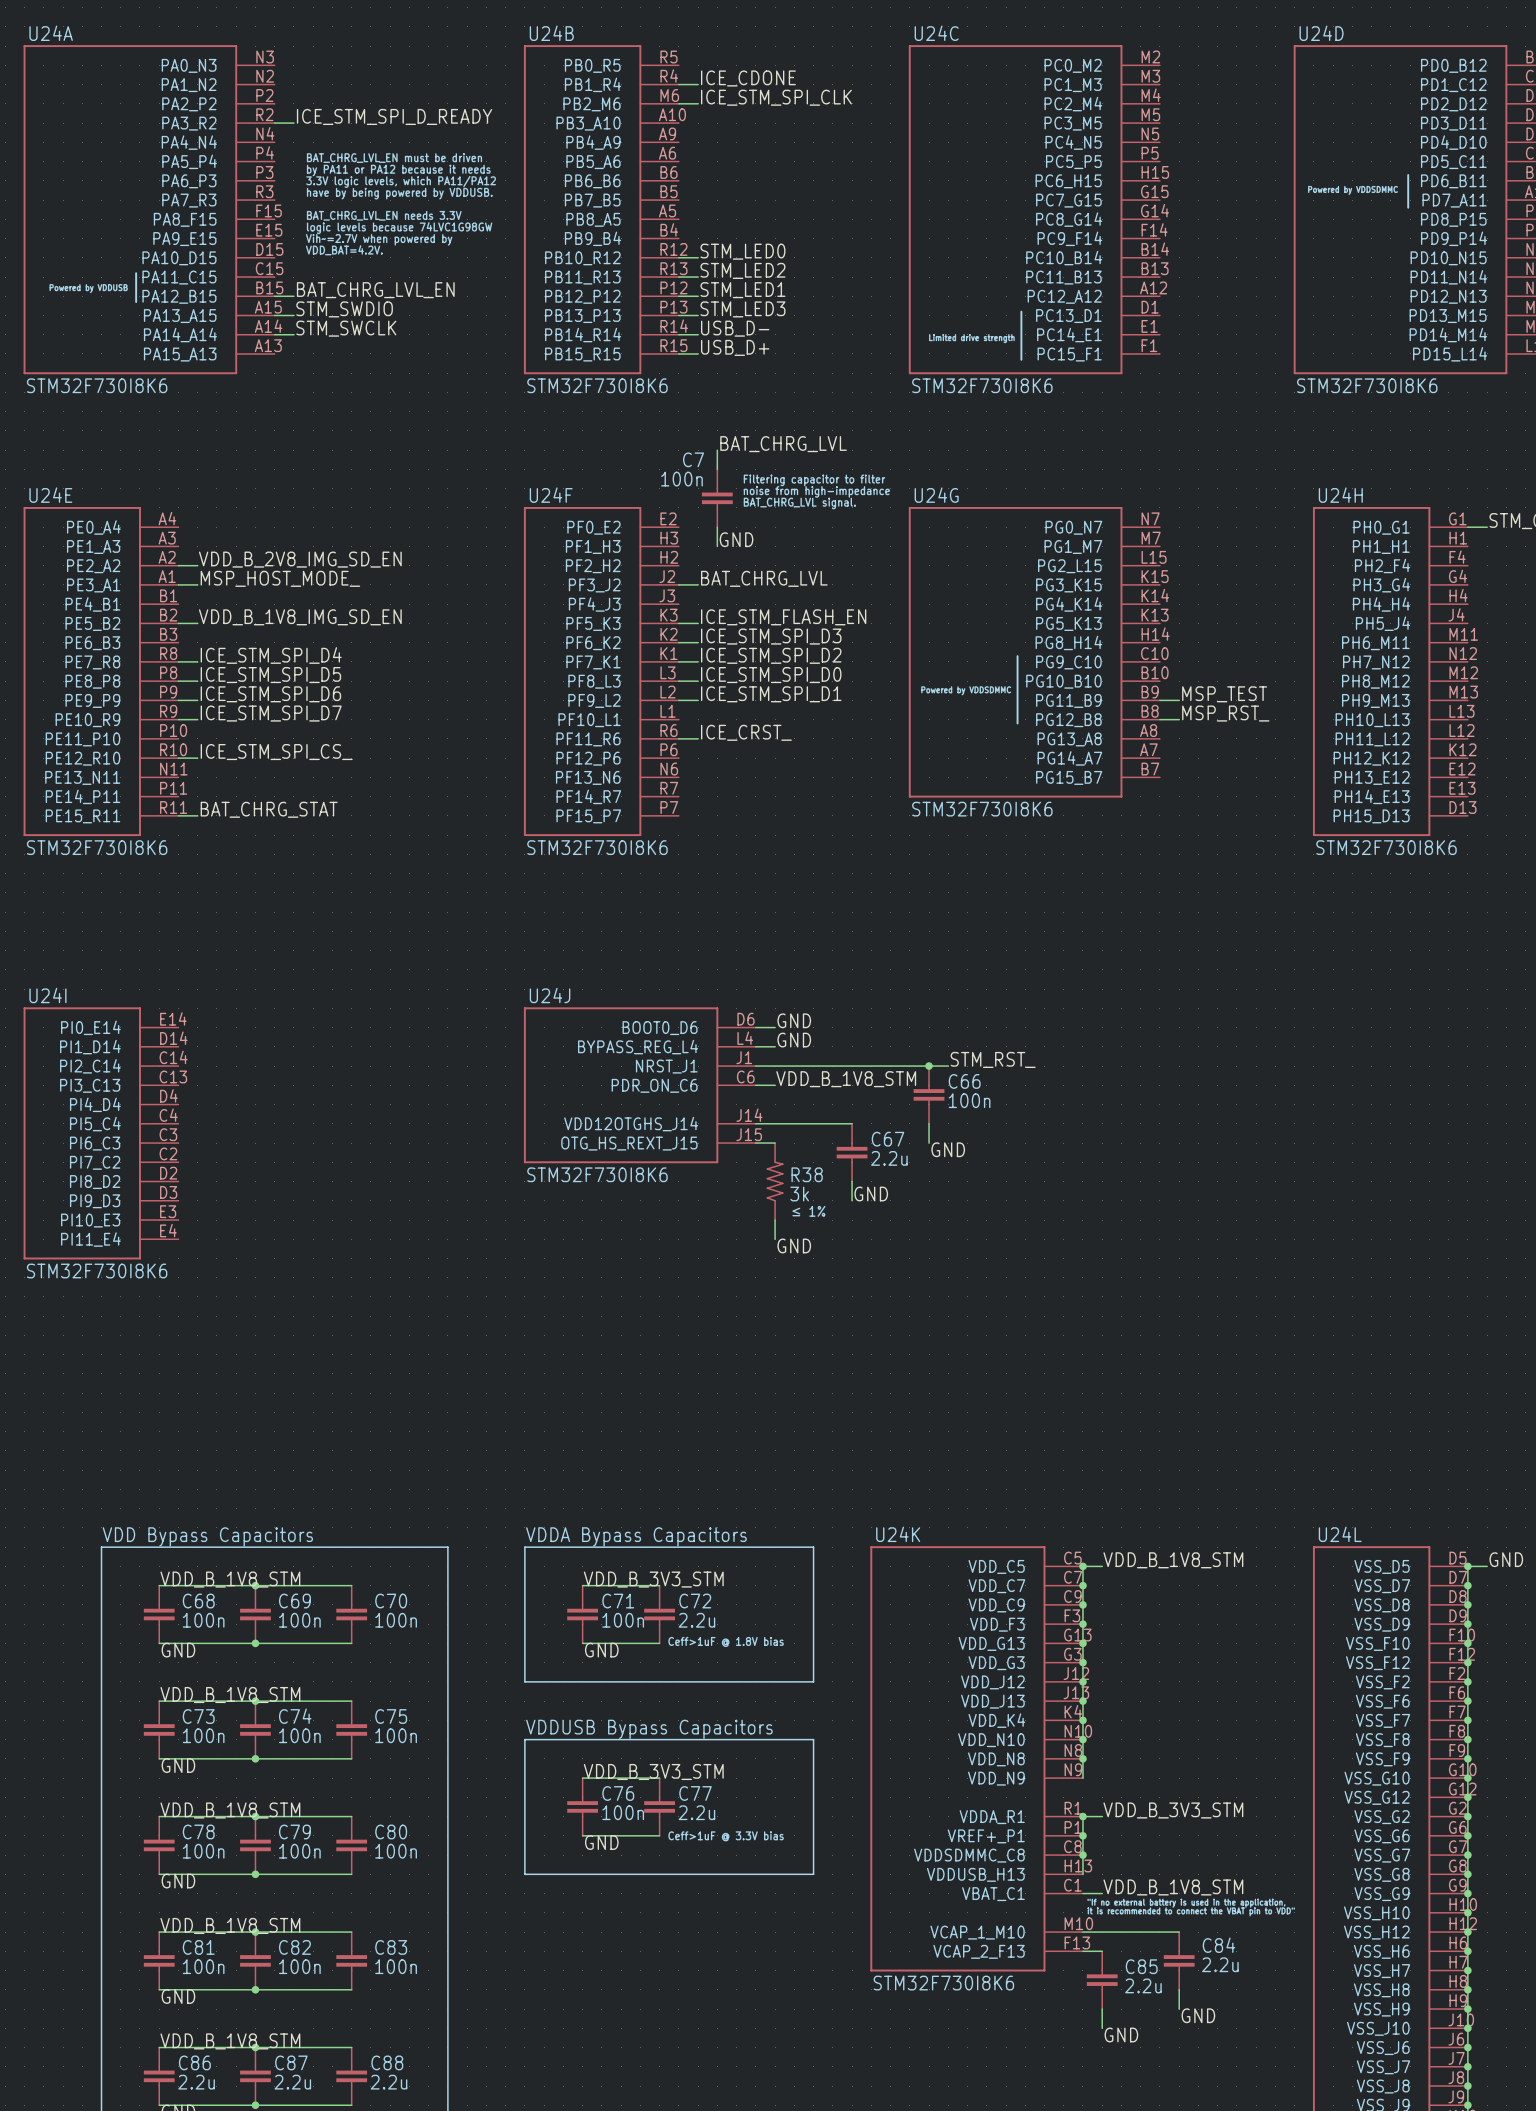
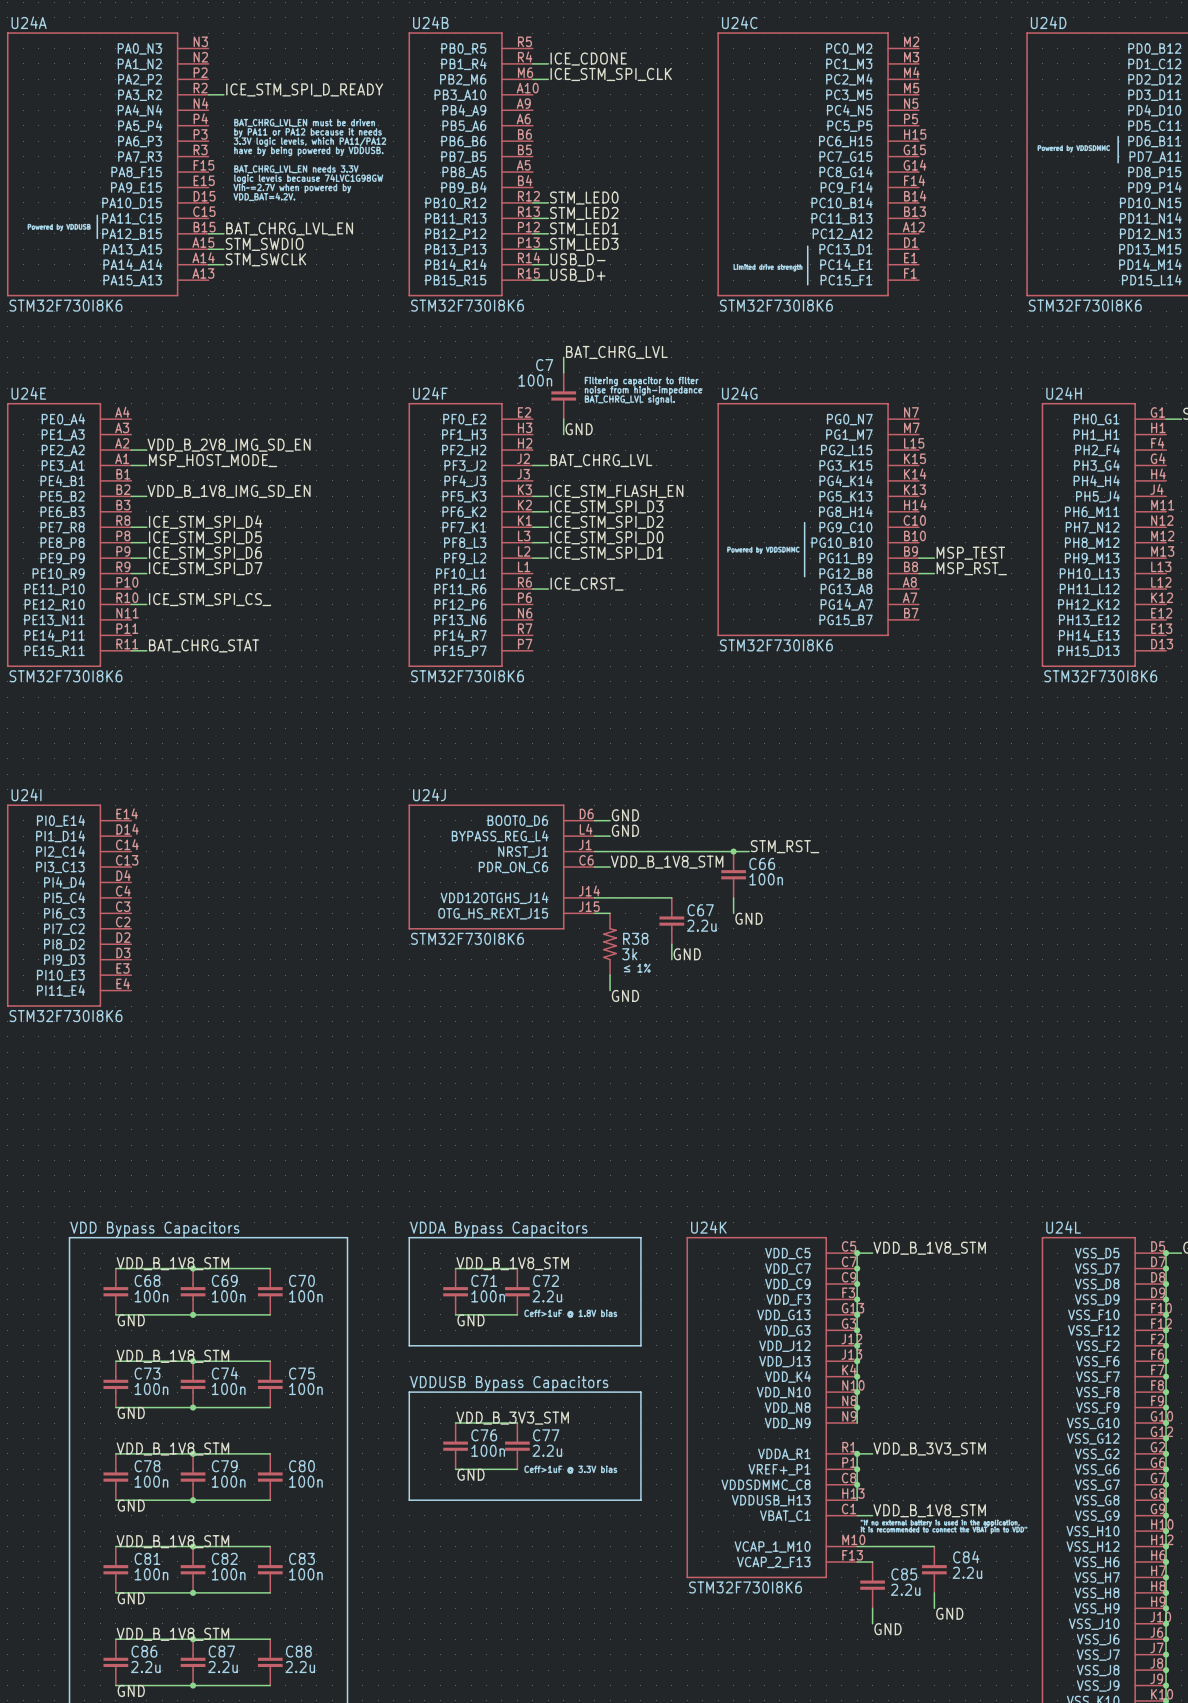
label: VDD_B_3V3_STM (653, 1579) -> VDD_B_1V8_STM (512, 1263)

